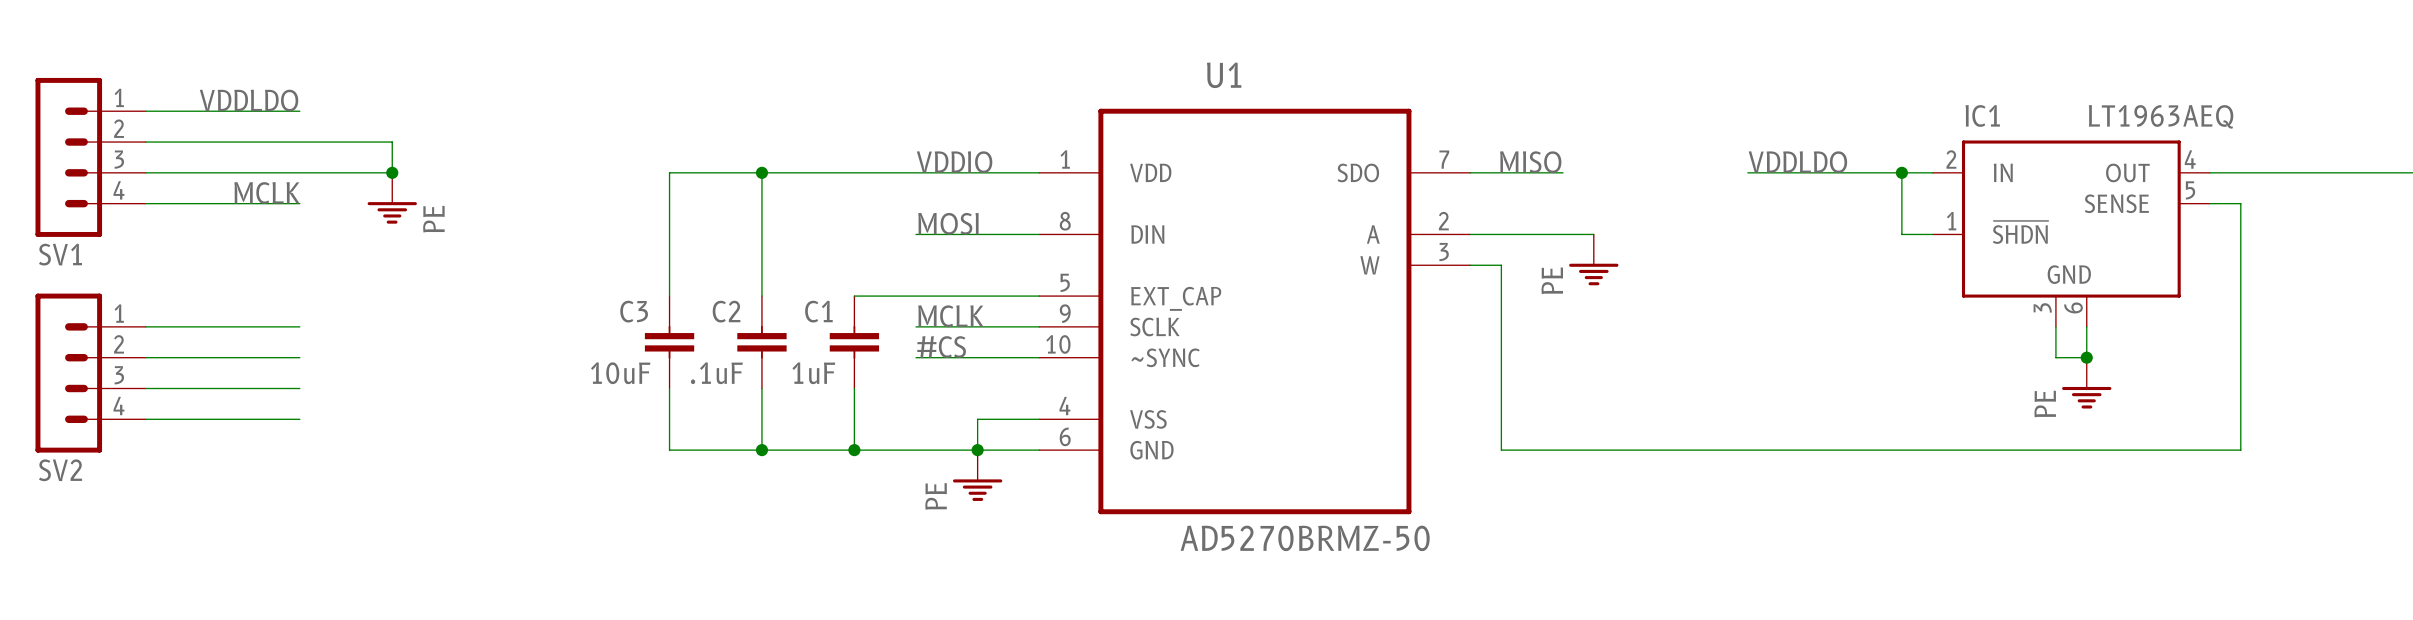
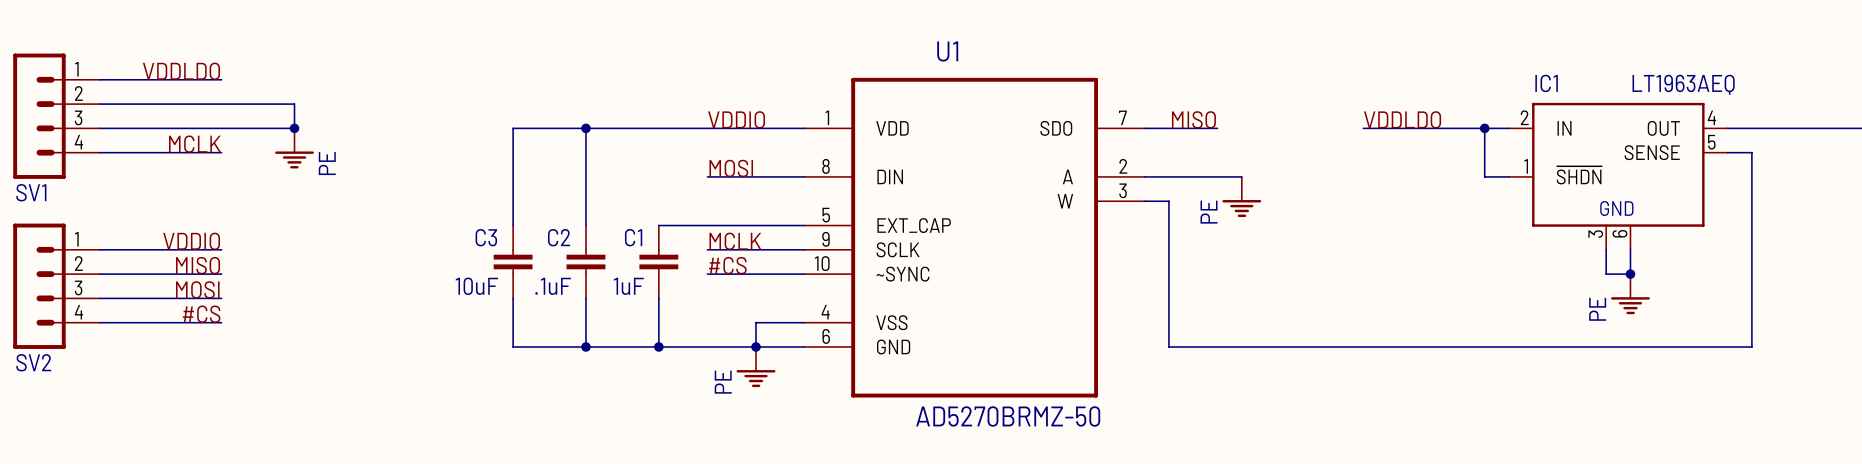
label: none -> VDDIO (191, 241)
label: none -> MISO (198, 265)
label: none -> MOSI (197, 289)
label: none -> #CS (201, 314)

